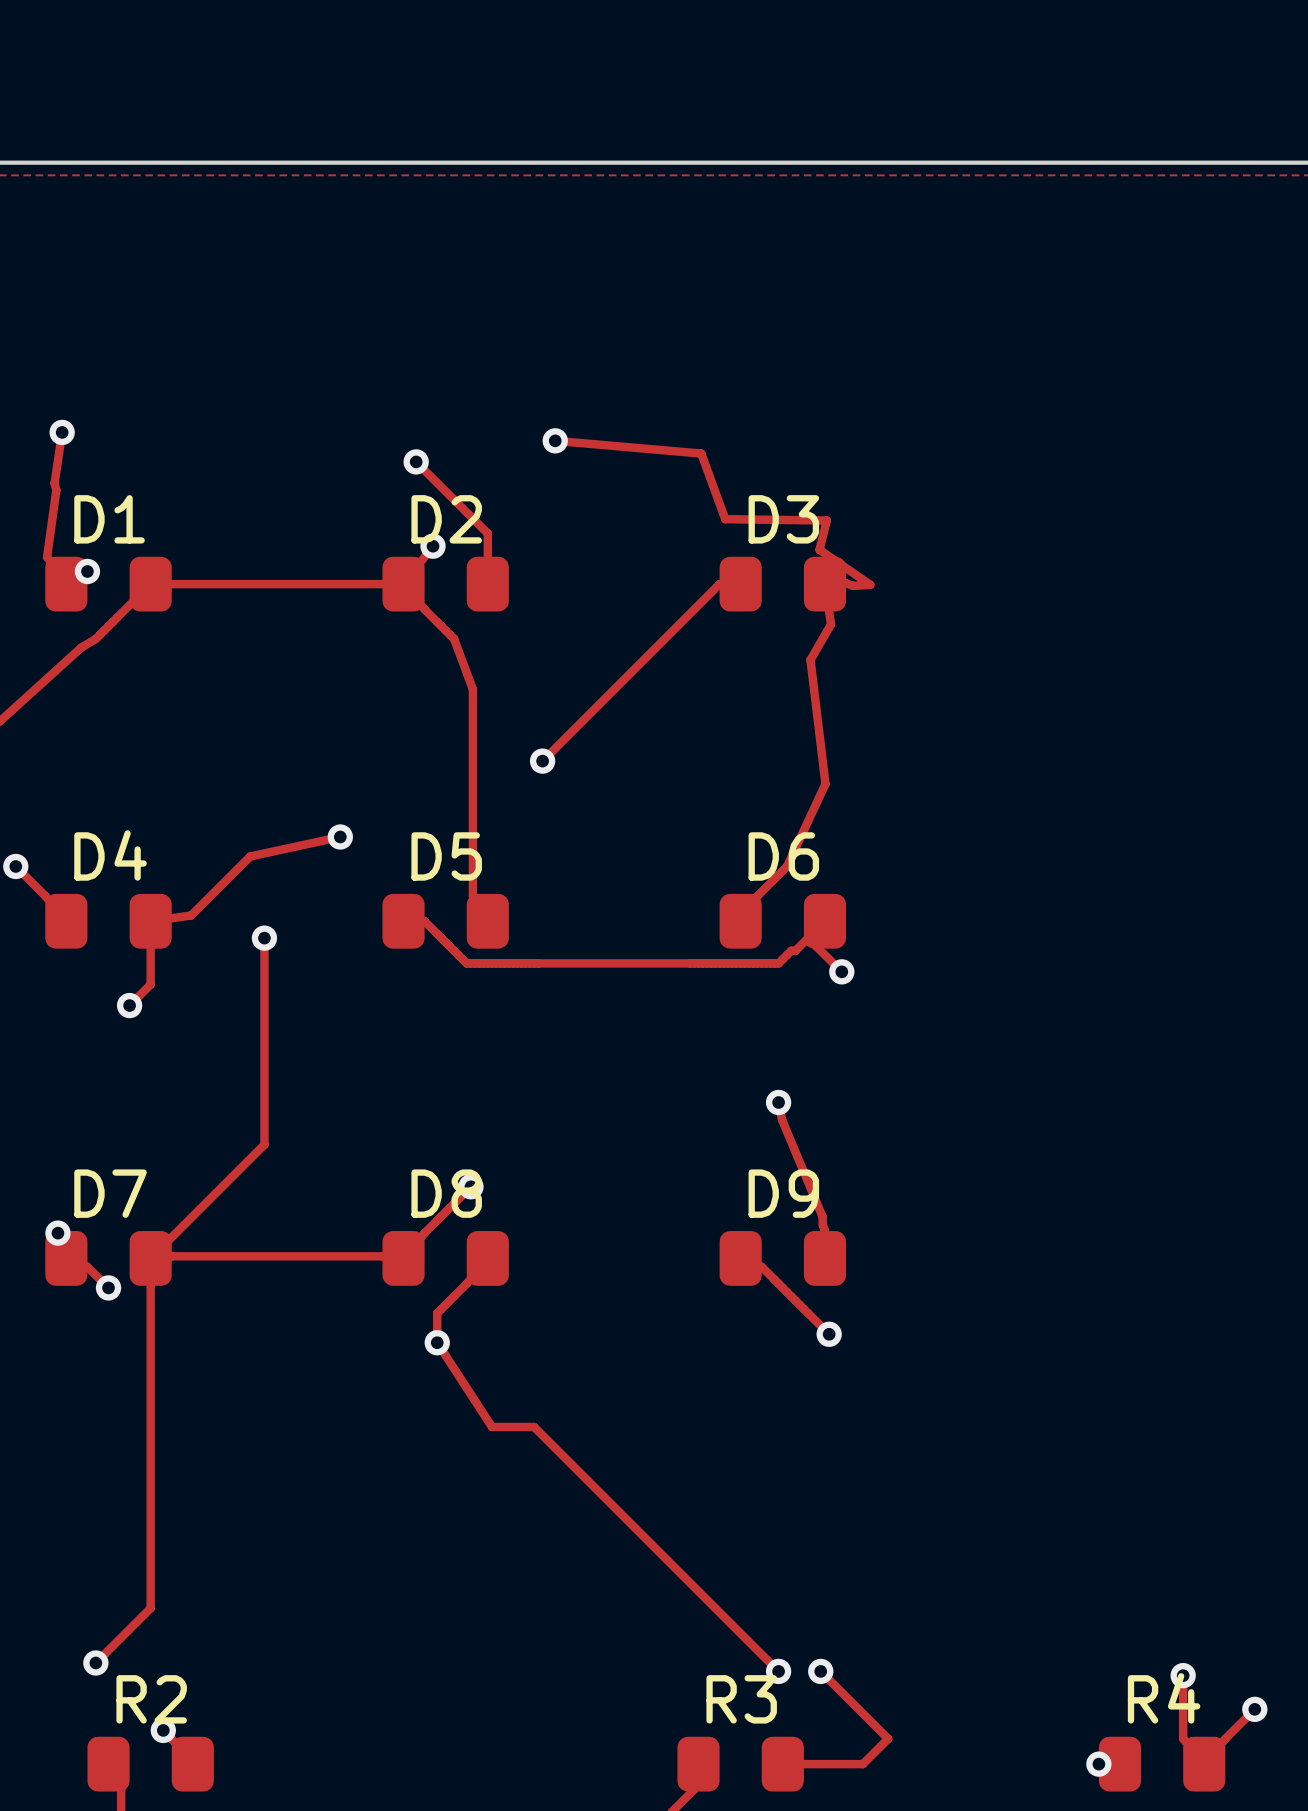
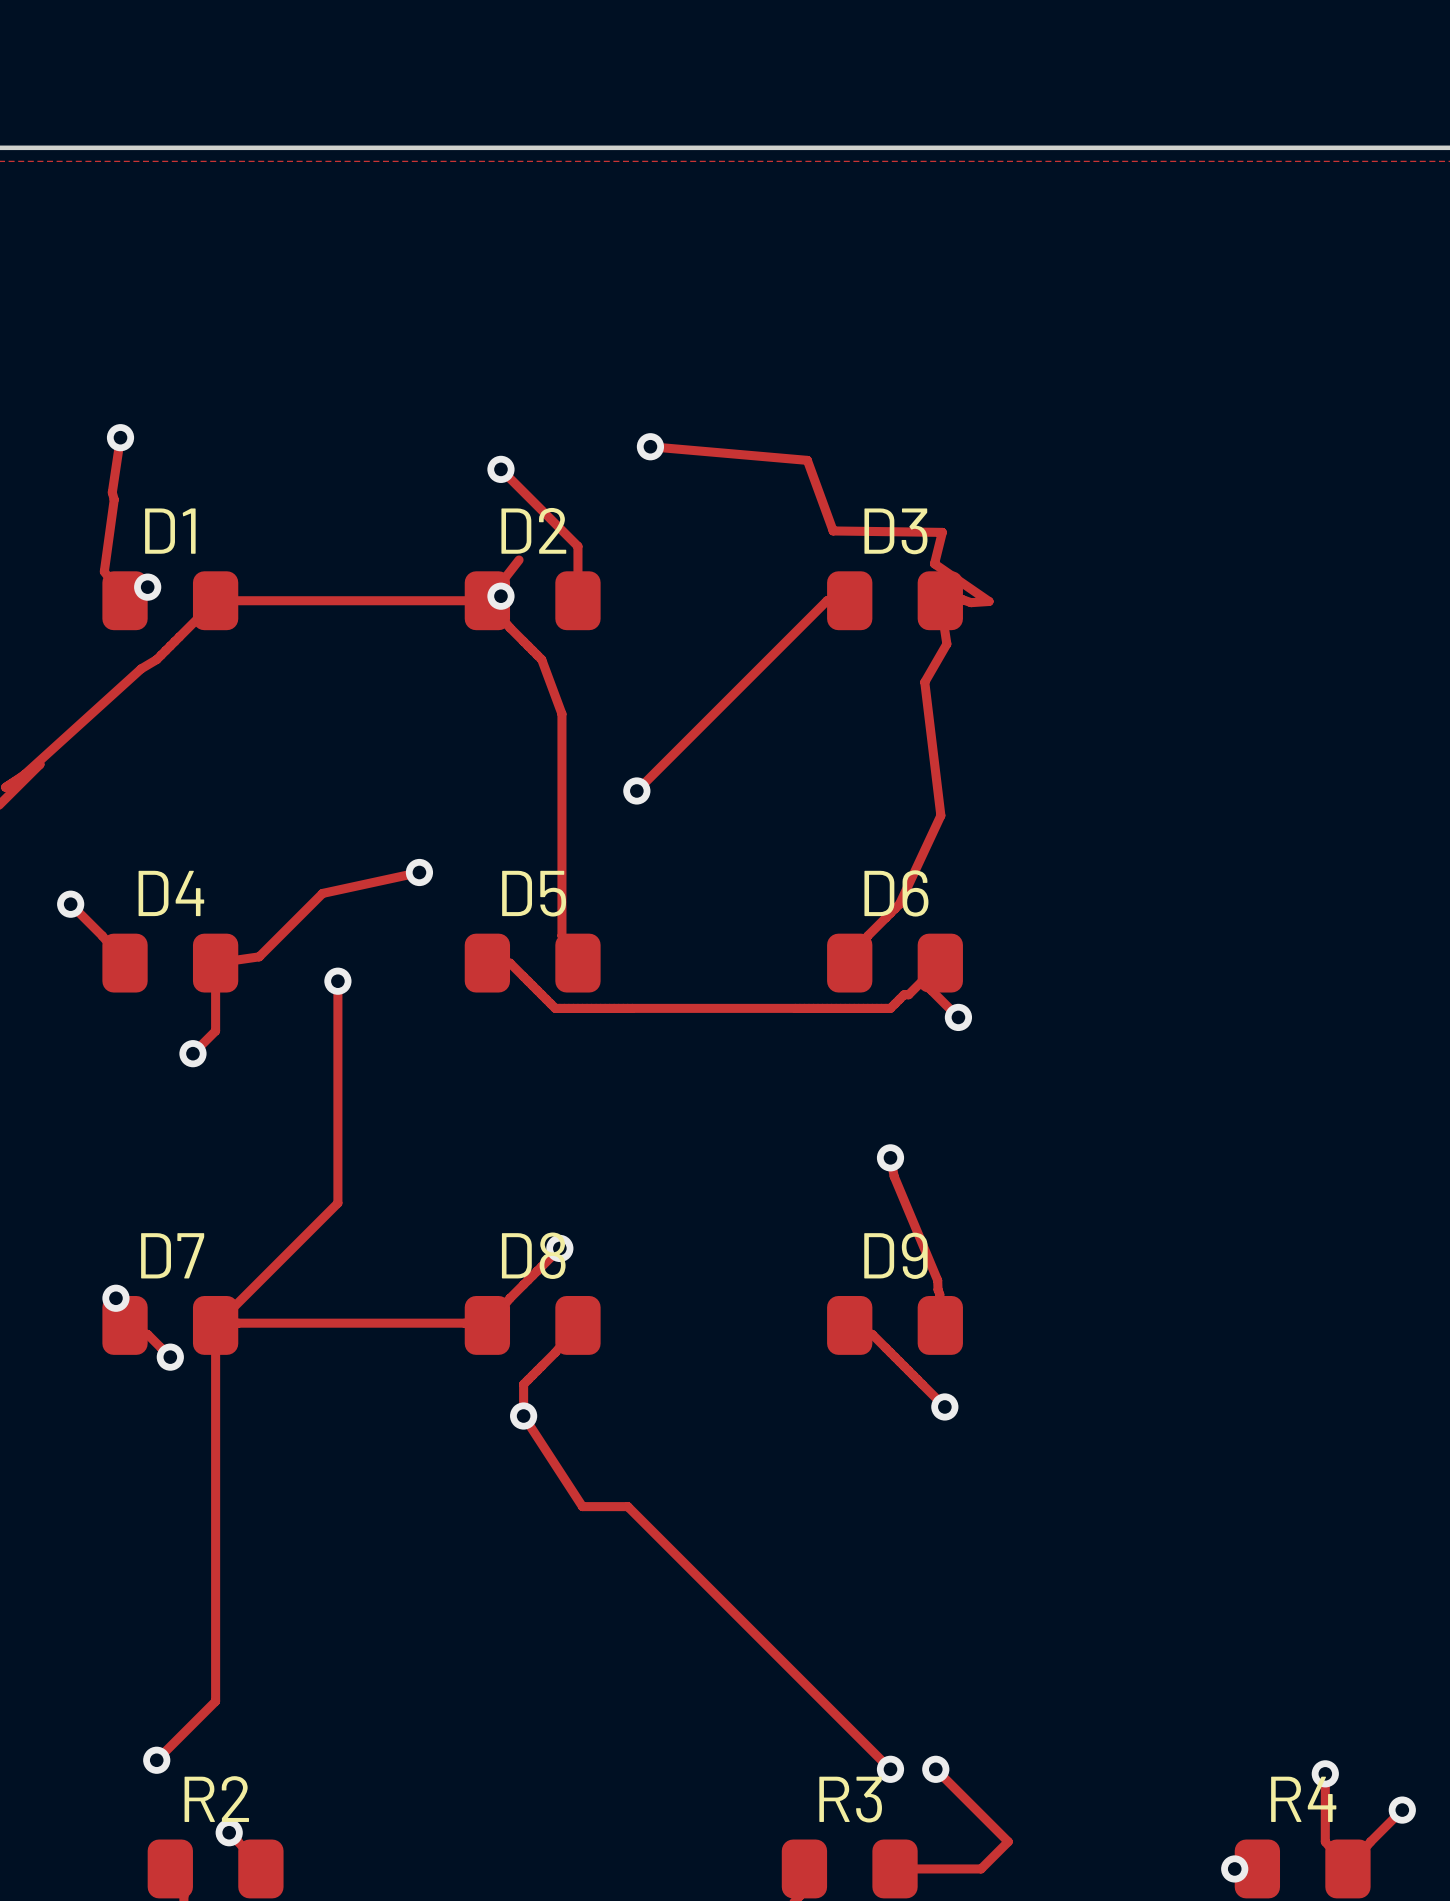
via position: (433, 546) -> (500, 596)

